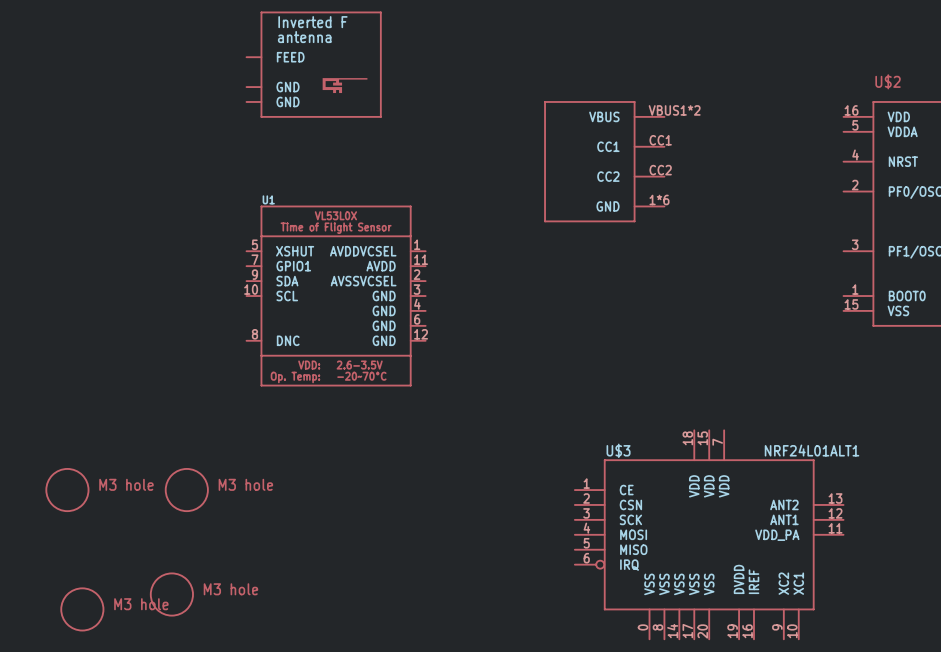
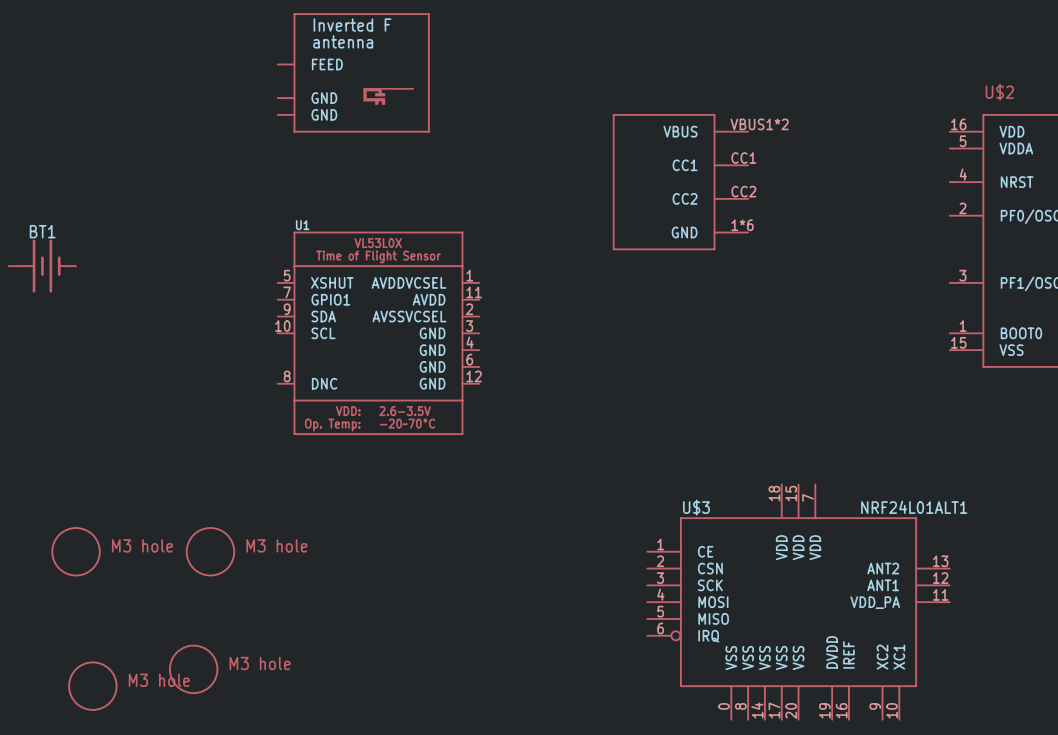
BT1: none -> (42, 266)

